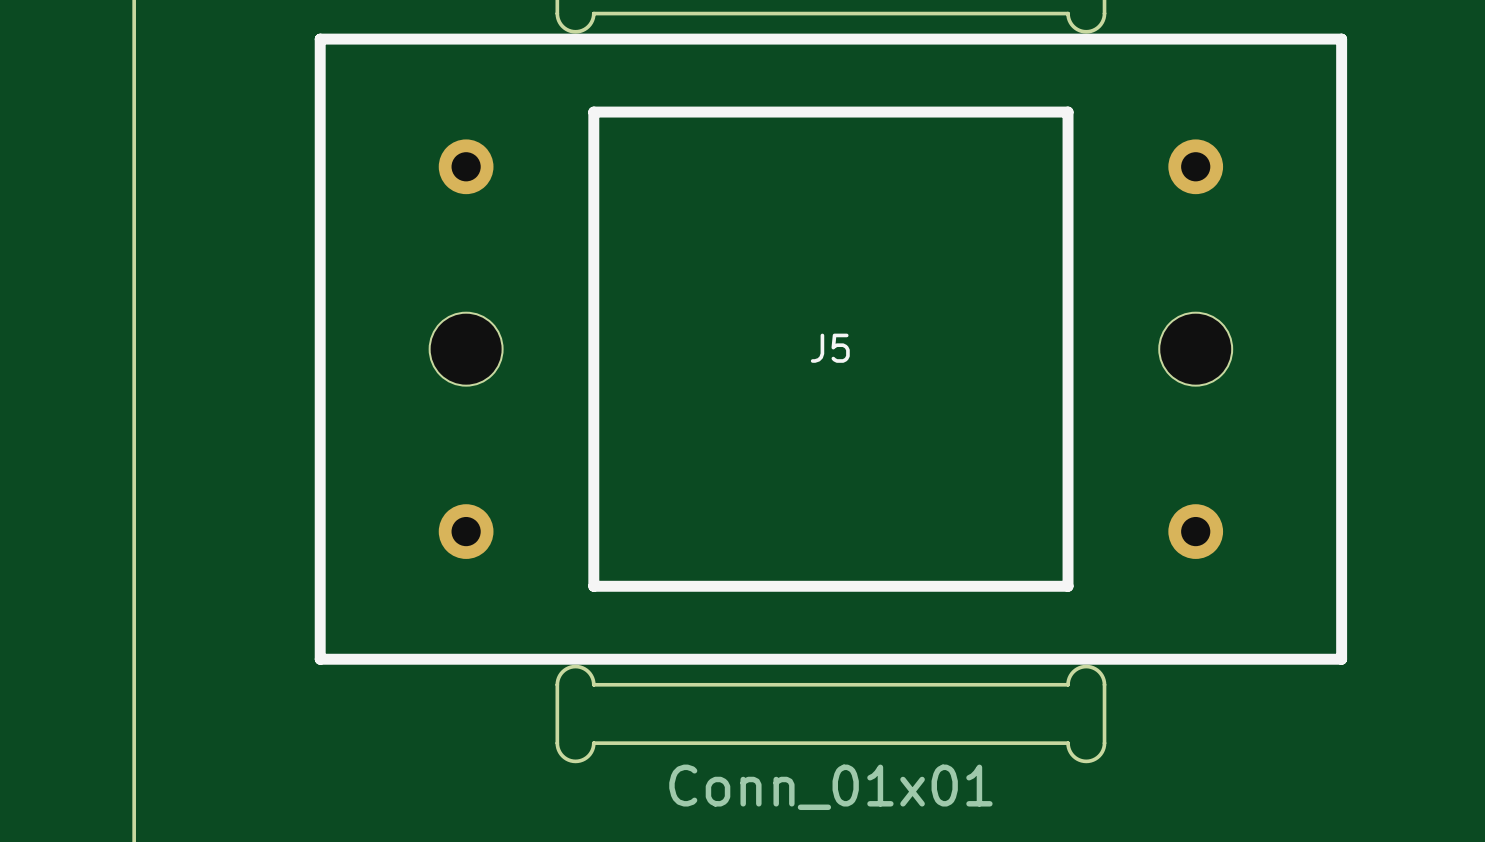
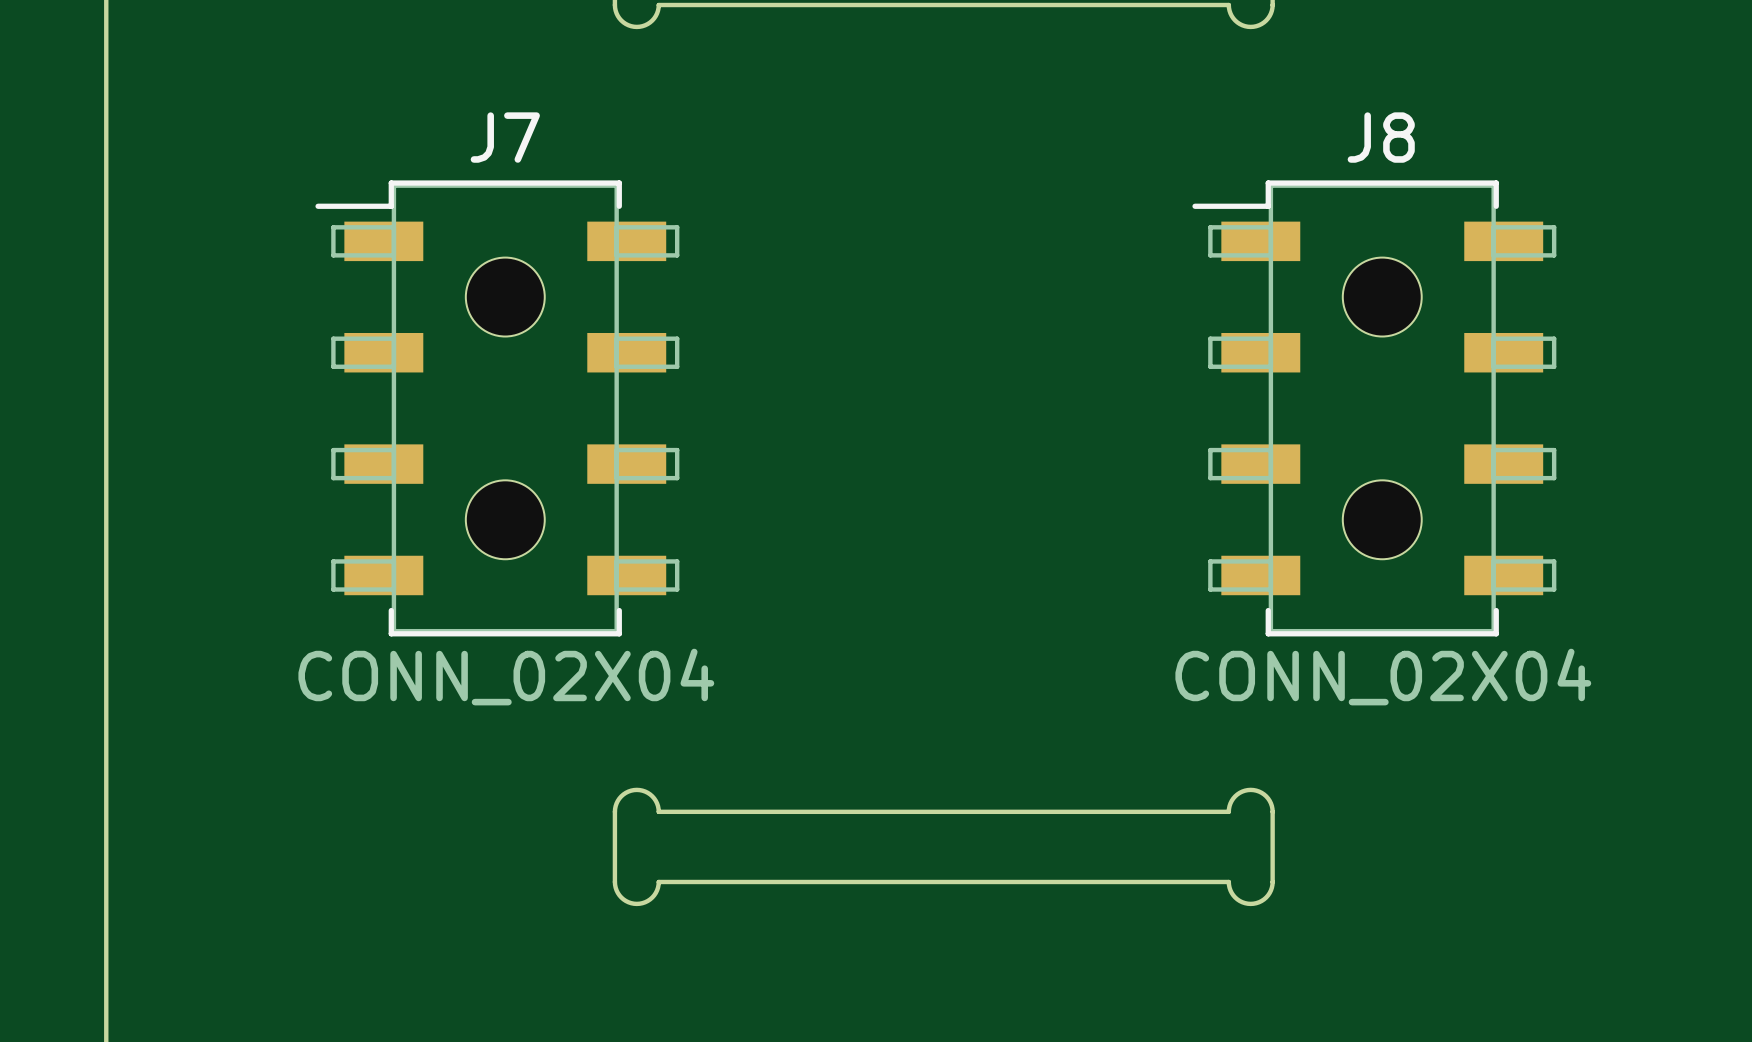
J7: none -> CONN_02X04 (497, 408)
J5: Conn_01x01 (830, 349) -> none
J8: none -> CONN_02X04 (1374, 408)

